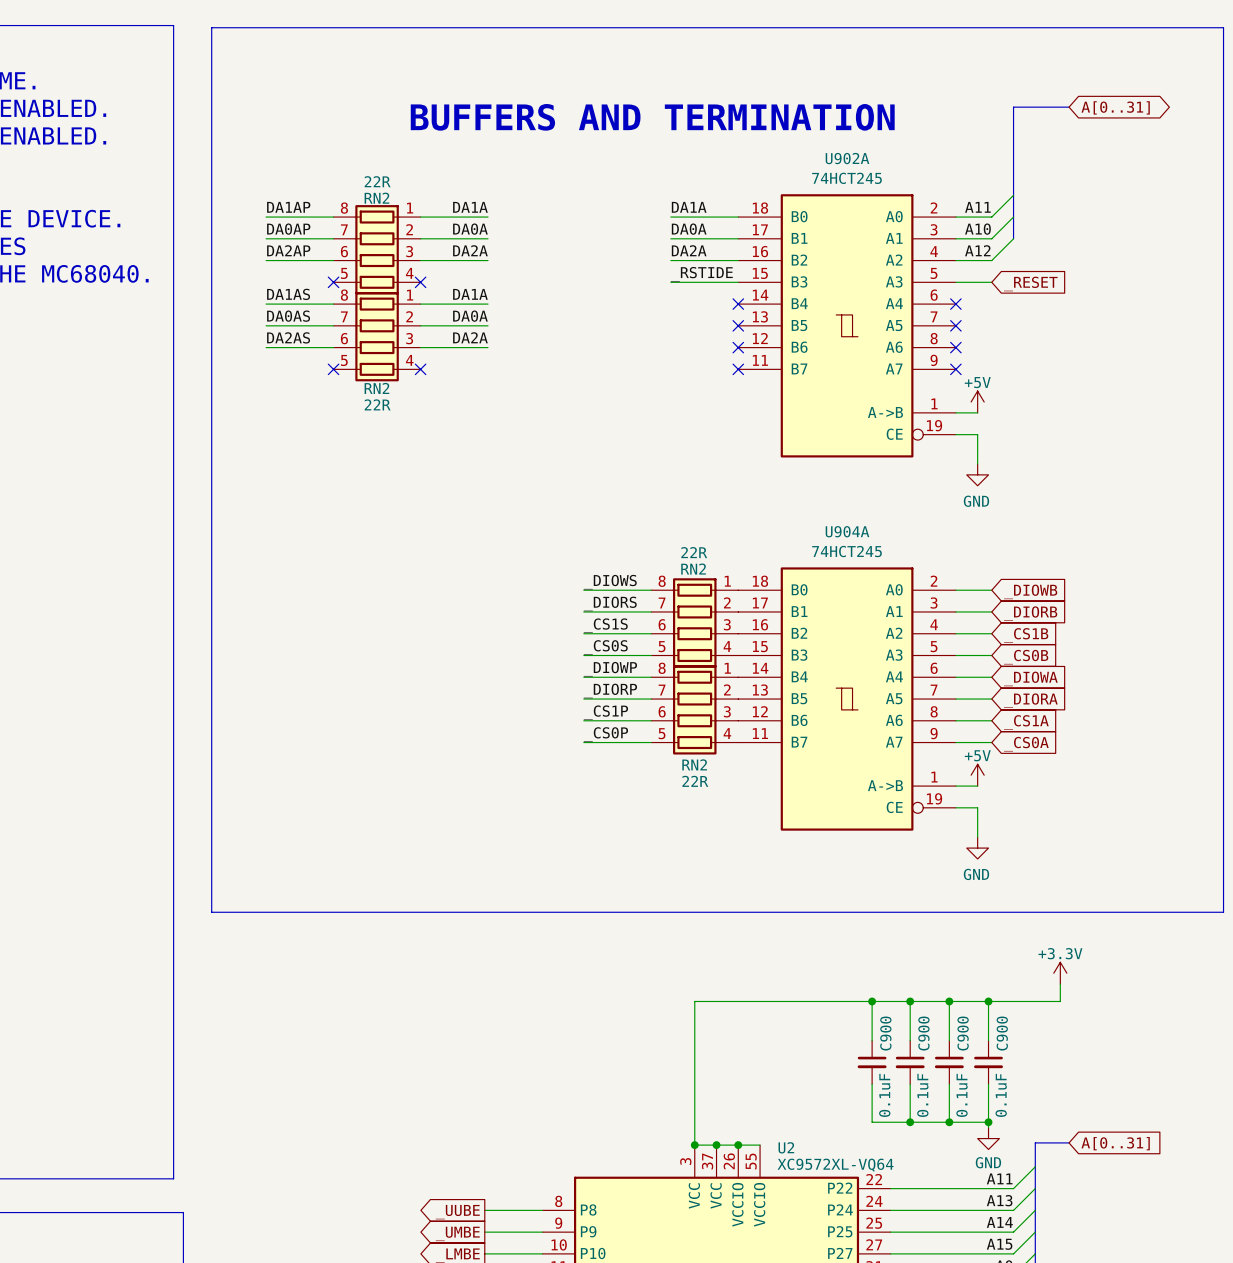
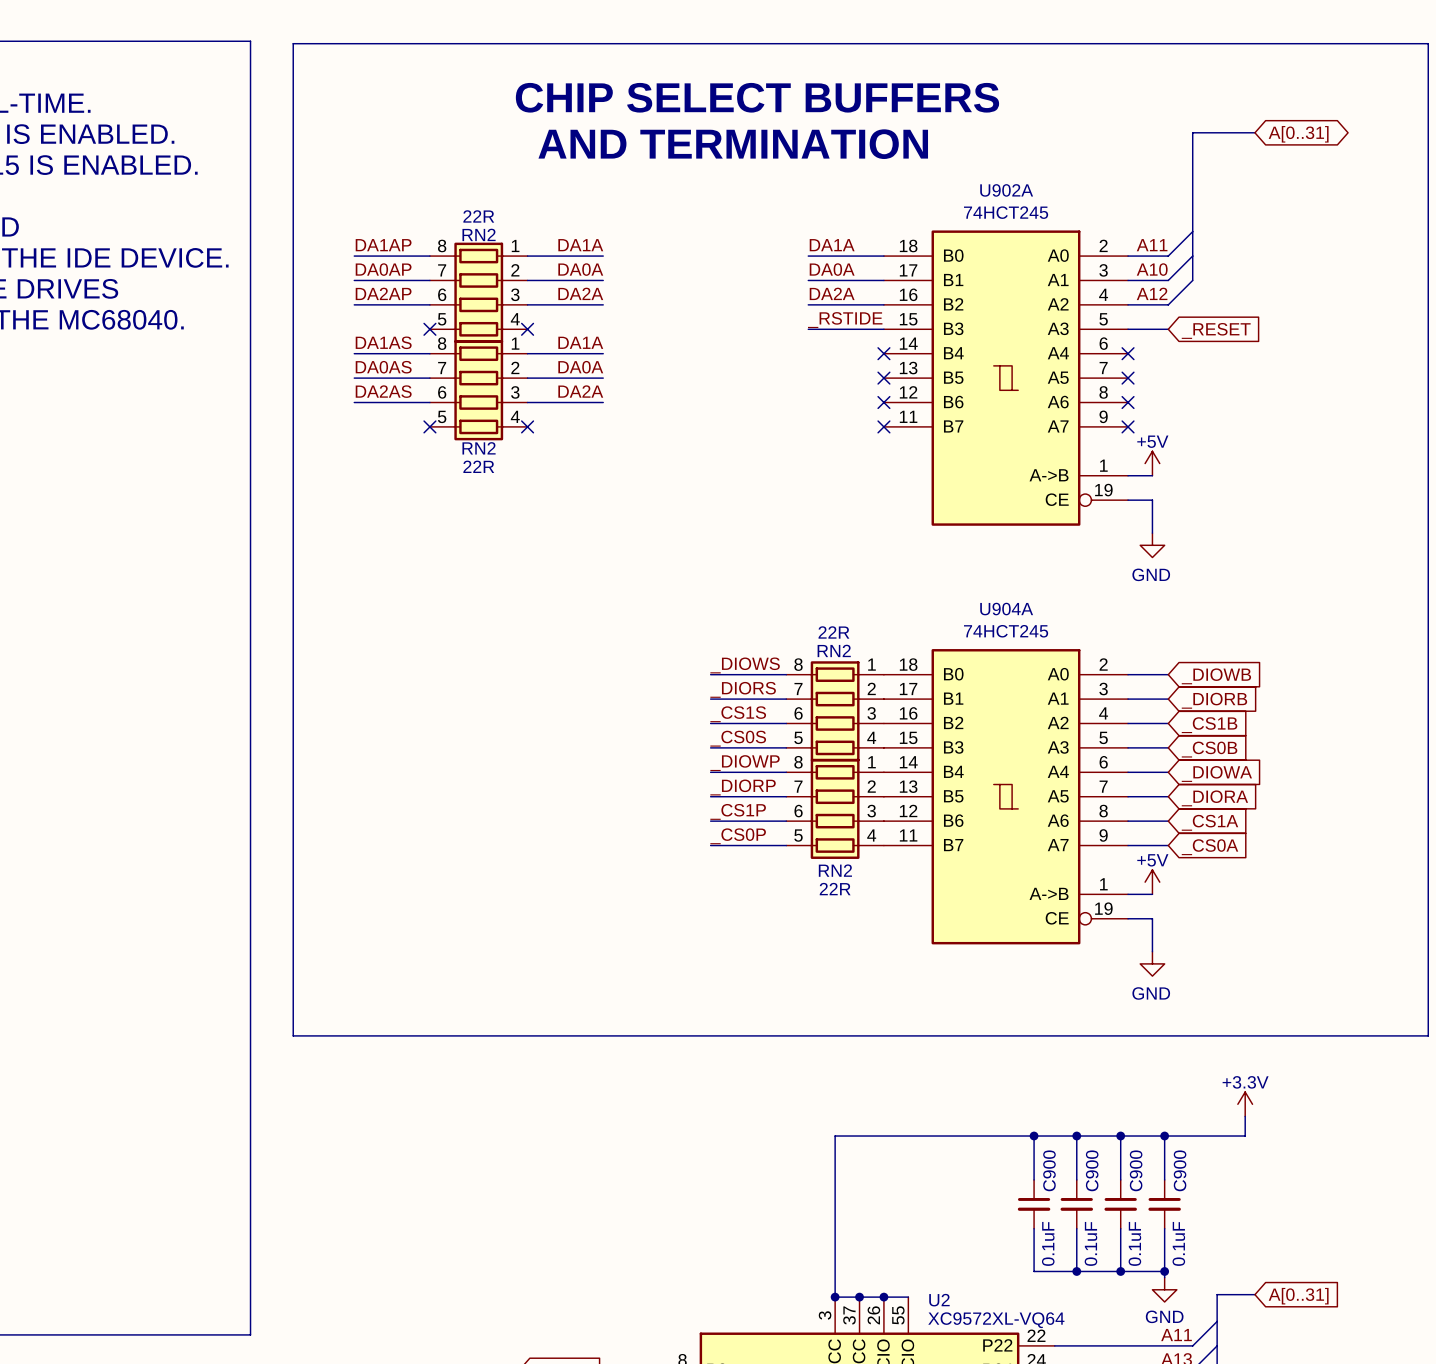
text: none -> CHIP SELECT BUFFERS (757, 97)
text: BUFFERS AND TERMINATION (652, 117) -> AND TERMINATION (733, 144)

